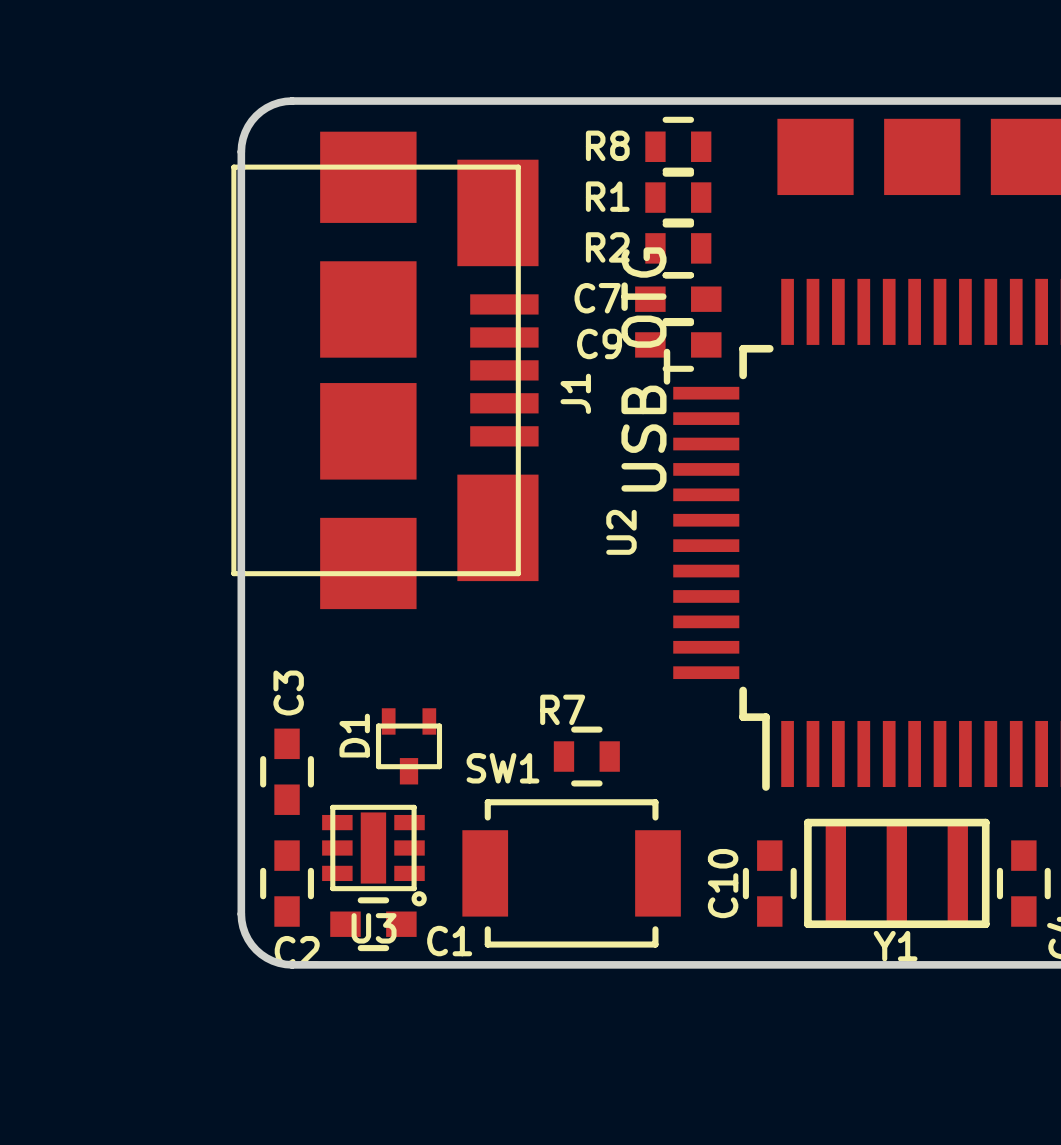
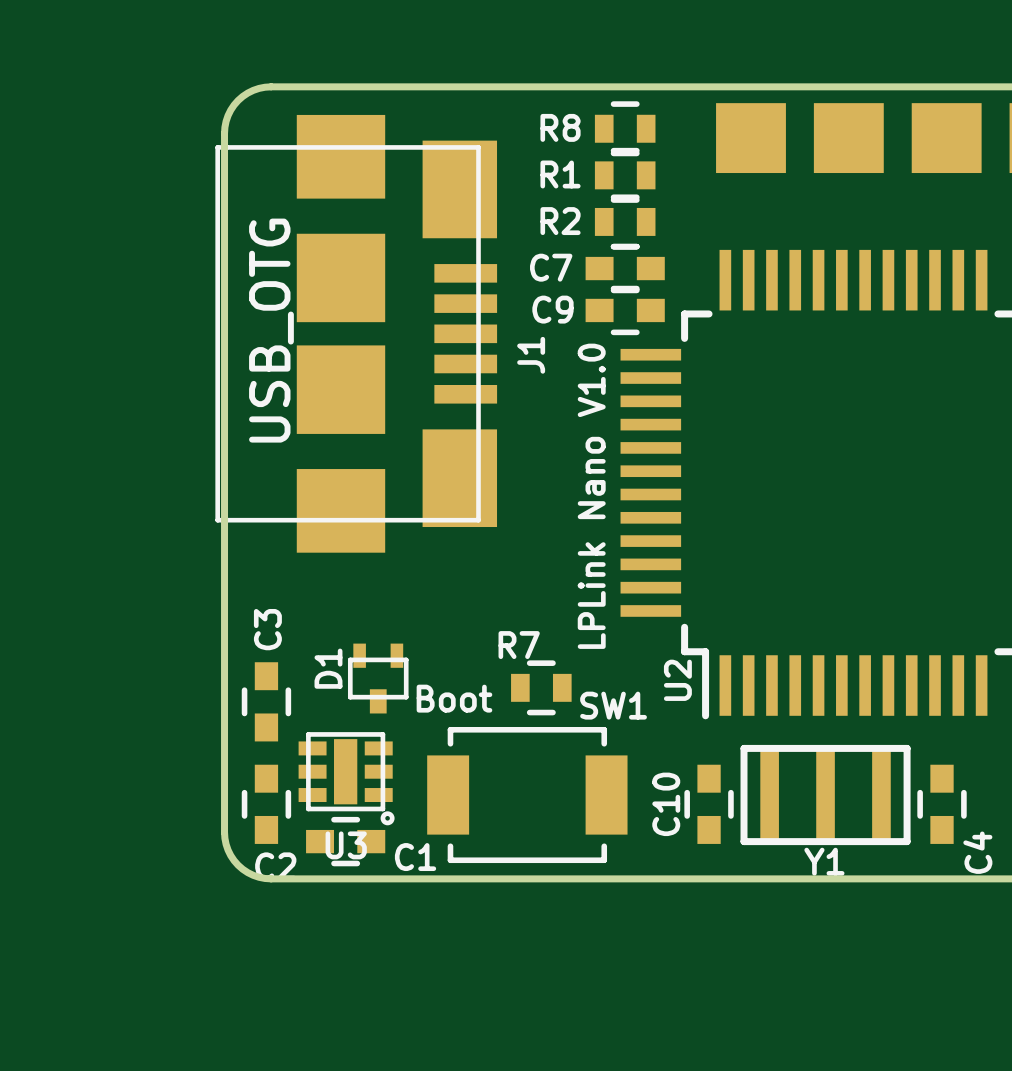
J1 value position: USB_OTG (645, 369) -> USB_OTG (271, 330)
U2 name position: U2 (621, 532) -> U2 (677, 680)
text: none -> LPLink Nano V1.0 (591, 496)
text: none -> Boot (454, 698)
SW1 name position: SW1 (503, 768) -> SW1 (613, 705)

